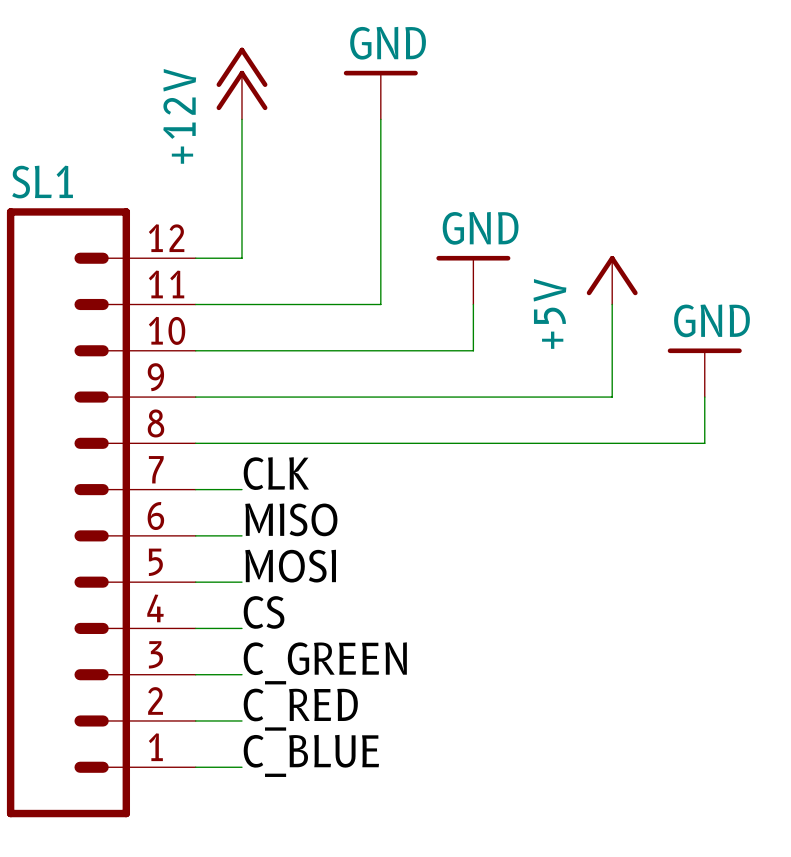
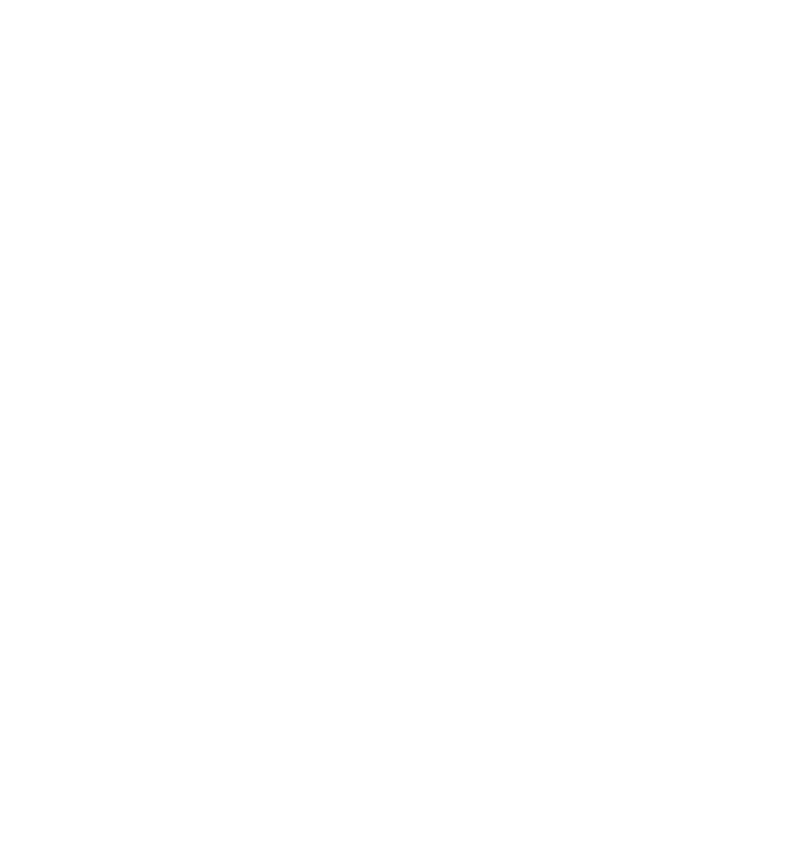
power symbol: +12V (241, 83) -> none
power symbol: GND (380, 95) -> none
wire: (241, 119) (241, 258) (195, 258) -> none
wire: (380, 119) (380, 304) (195, 304) -> none
power symbol: GND (473, 280) -> none
power symbol: +5V (612, 280) -> none
wire: (473, 304) (473, 350) (195, 350) -> none
wire: (612, 304) (612, 397) (195, 397) -> none
power symbol: GND (704, 372) -> none
wire: (704, 397) (704, 443) (195, 443) -> none
label: CLK (276, 473) -> none
wire: (195, 489) (241, 489) -> none
SL1: (101, 512) -> none
label: MISO (291, 519) -> none
wire: (195, 535) (241, 535) -> none
label: MOSI (290, 566) -> none
wire: (195, 582) (241, 582) -> none
label: CS (264, 612) -> none
wire: (195, 628) (241, 628) -> none
label: C_GREEN (325, 663) -> none
wire: (195, 674) (241, 674) -> none
label: C_RED (300, 709) -> none
wire: (195, 720) (241, 720) -> none
label: C_BLUE (311, 755) -> none
wire: (195, 767) (241, 767) -> none

